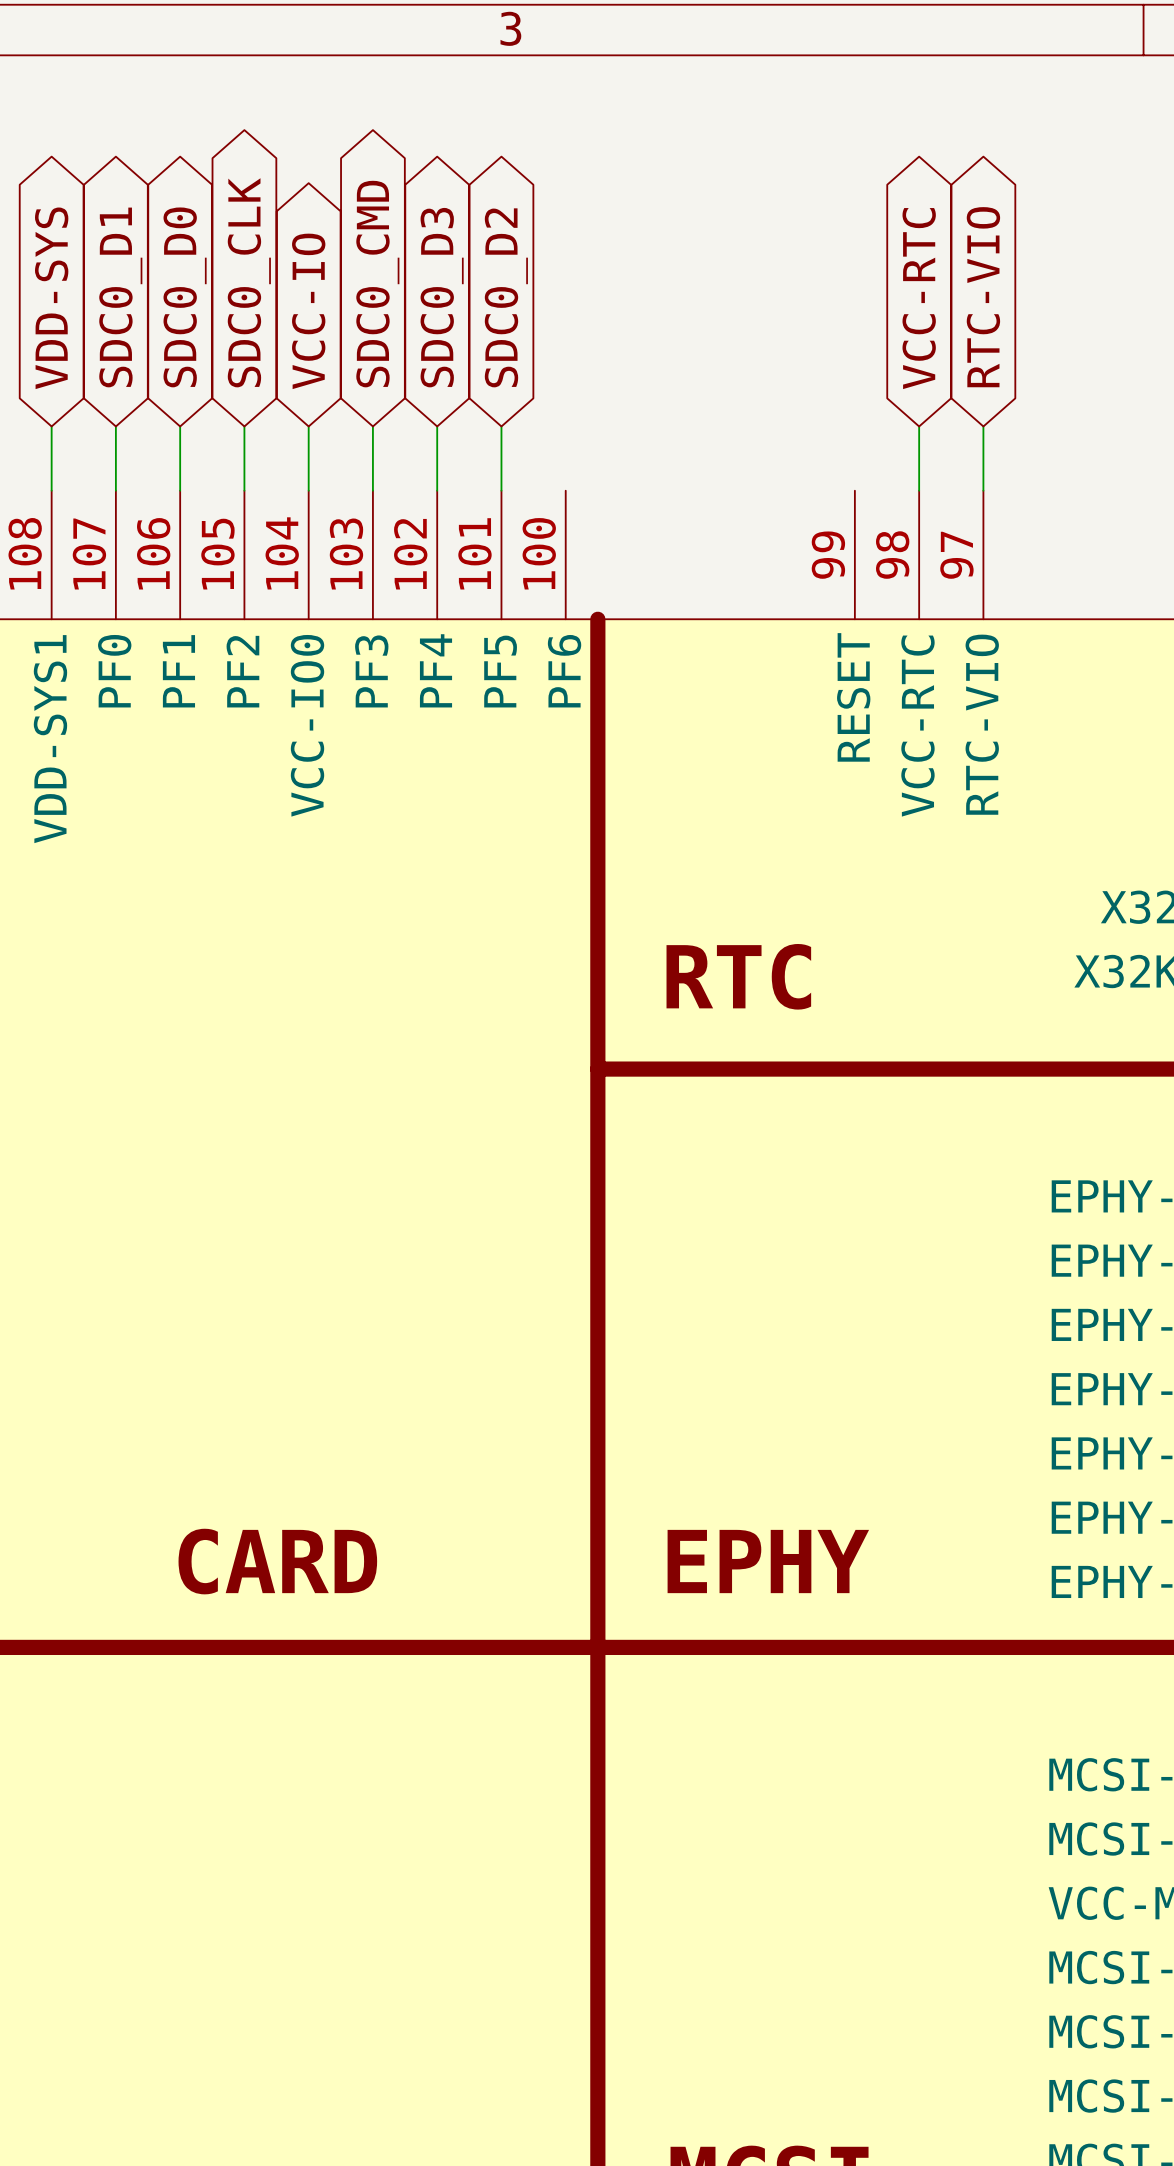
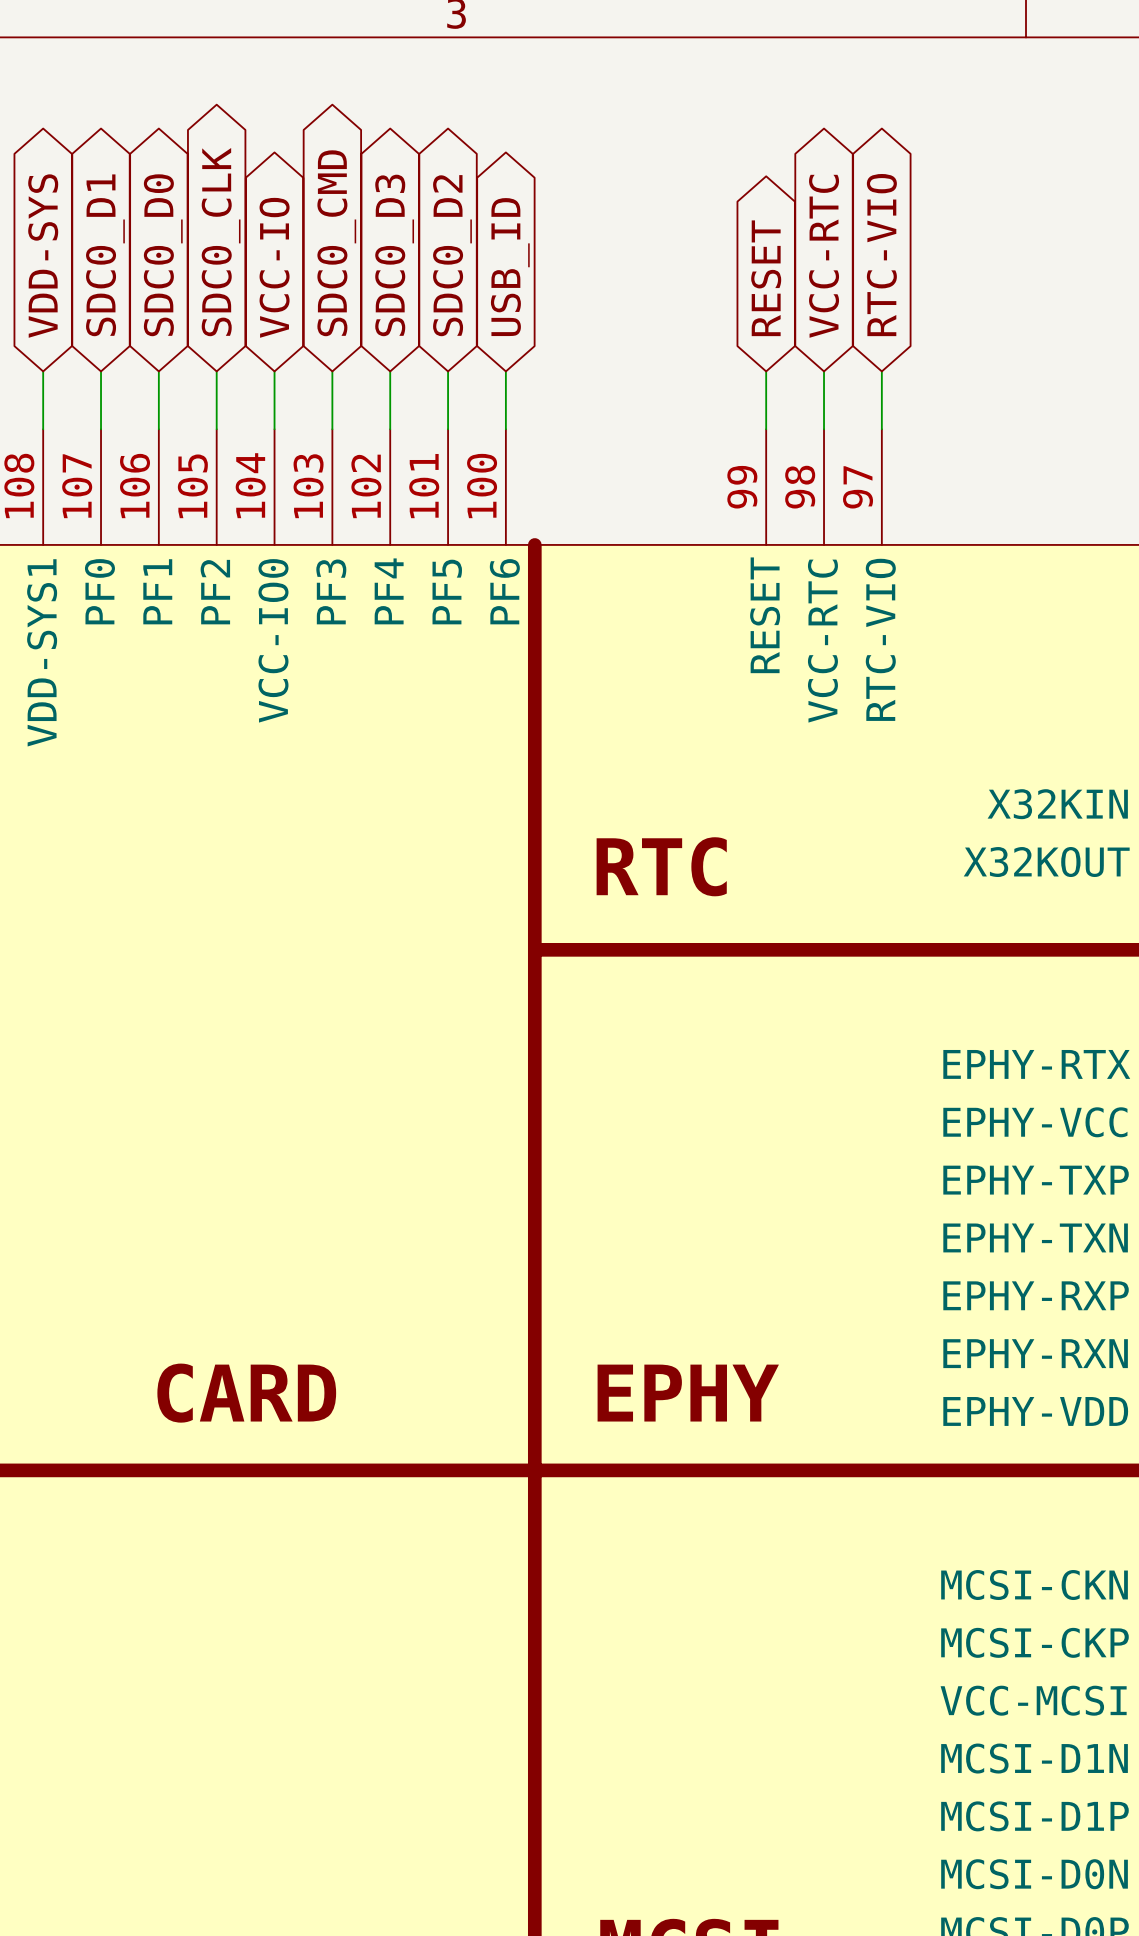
global label: none -> USB_ID (510, 267)
global label: none -> RESET (766, 278)
wire: none -> (505, 371) (505, 429)
wire: none -> (766, 371) (766, 429)

